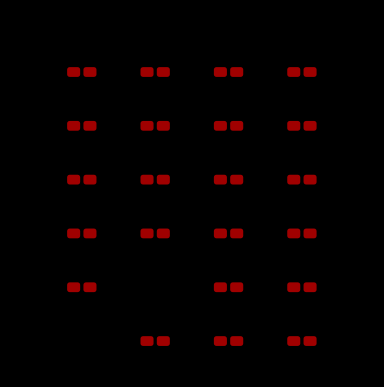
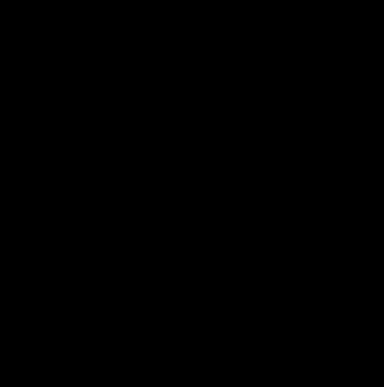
part: (81, 72) -> none
part: (155, 72) -> none
part: (228, 72) -> none
part: (301, 72) -> none
part: (81, 125) -> none
part: (155, 125) -> none
part: (228, 125) -> none
part: (301, 125) -> none
part: (81, 179) -> none
part: (155, 179) -> none
part: (228, 179) -> none
part: (301, 179) -> none
part: (81, 233) -> none
part: (155, 233) -> none
part: (228, 233) -> none
part: (301, 233) -> none
part: (81, 287) -> none
part: (228, 287) -> none
part: (301, 287) -> none
part: (155, 341) -> none
part: (228, 341) -> none
part: (301, 341) -> none

